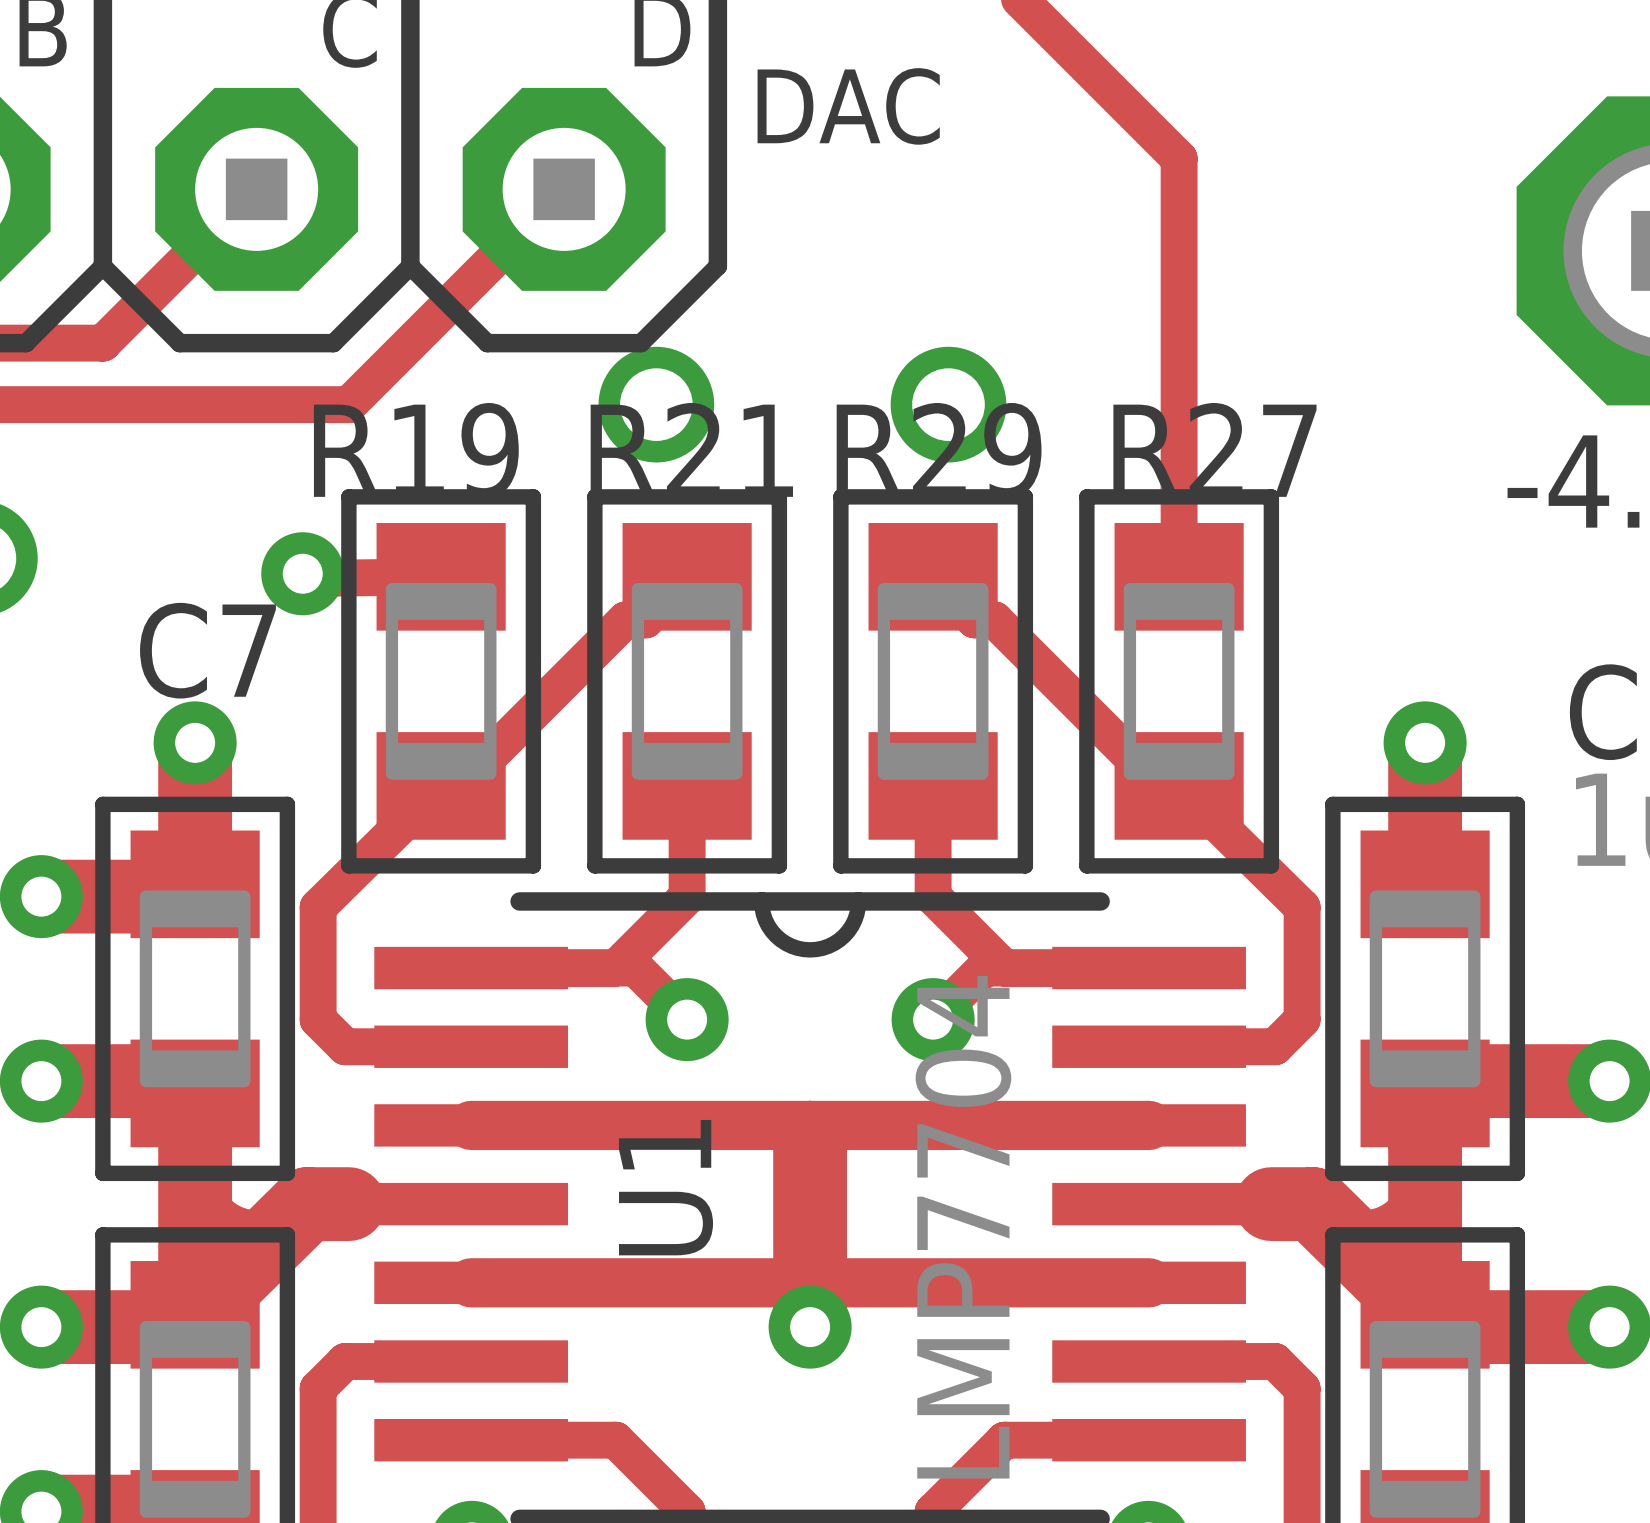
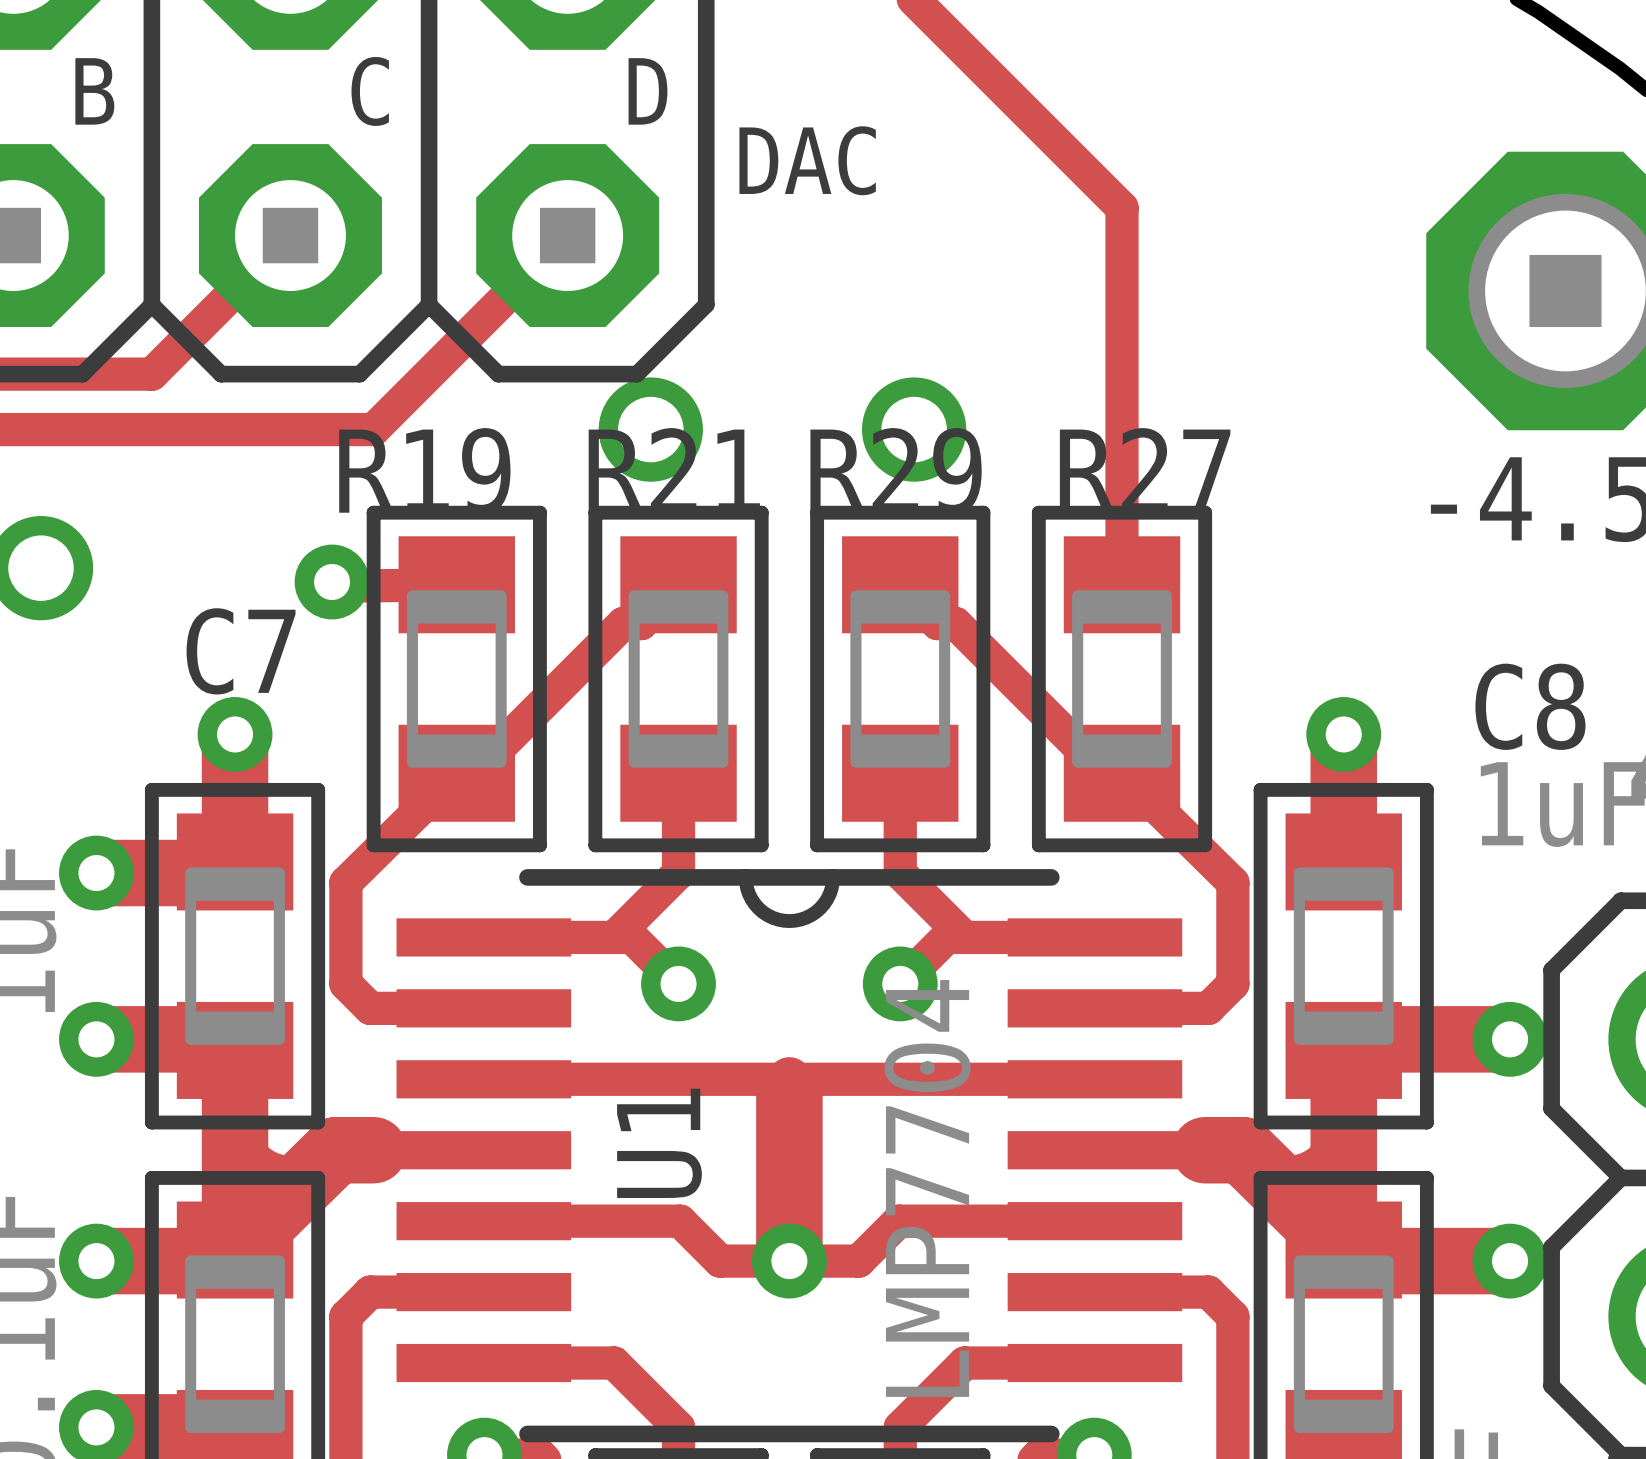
track width: thick (471, 1125) (1149, 1125) -> thin (483, 1079) (1094, 1079)
track width: thick (471, 1282) (688, 1282) -> thin (483, 1221) (680, 1221)
track: (688, 1282) (931, 1282) -> (680, 1221) (720, 1261) (858, 1261) (898, 1221)
track width: thick (931, 1282) (1149, 1282) -> thin (898, 1221) (1094, 1221)

